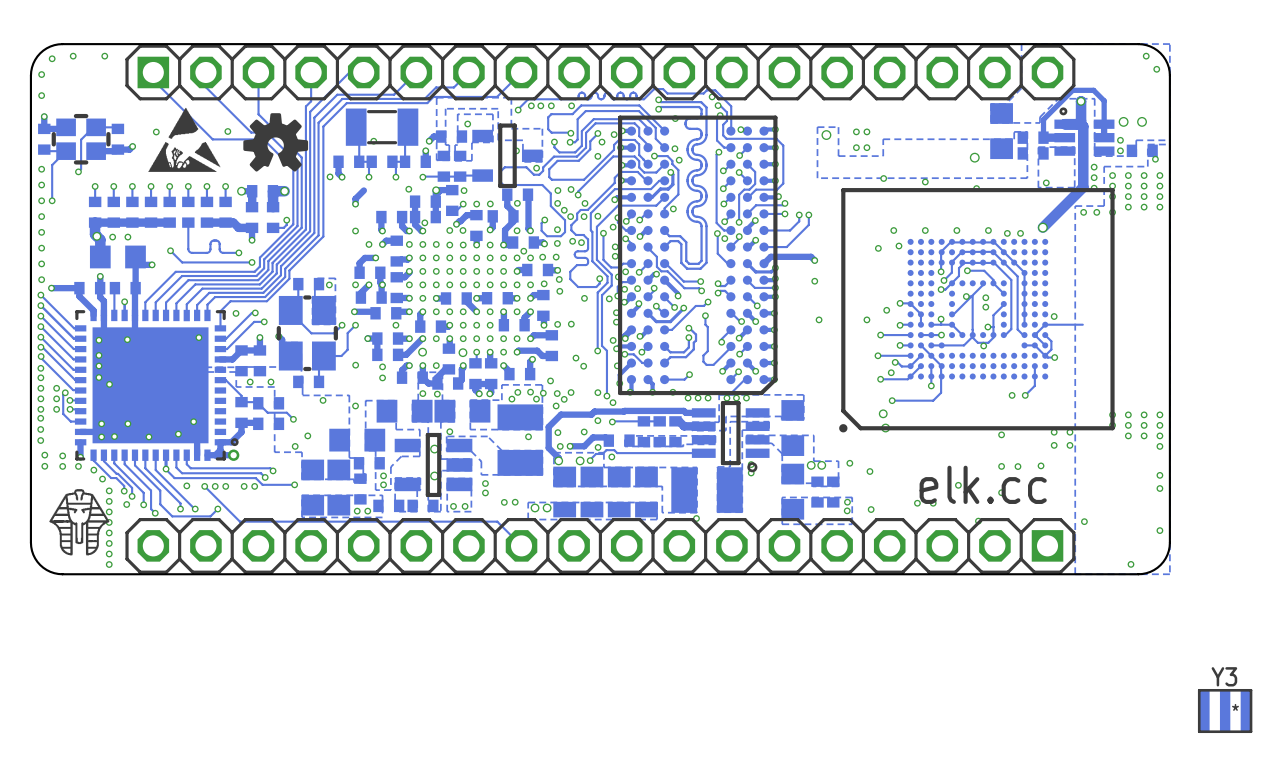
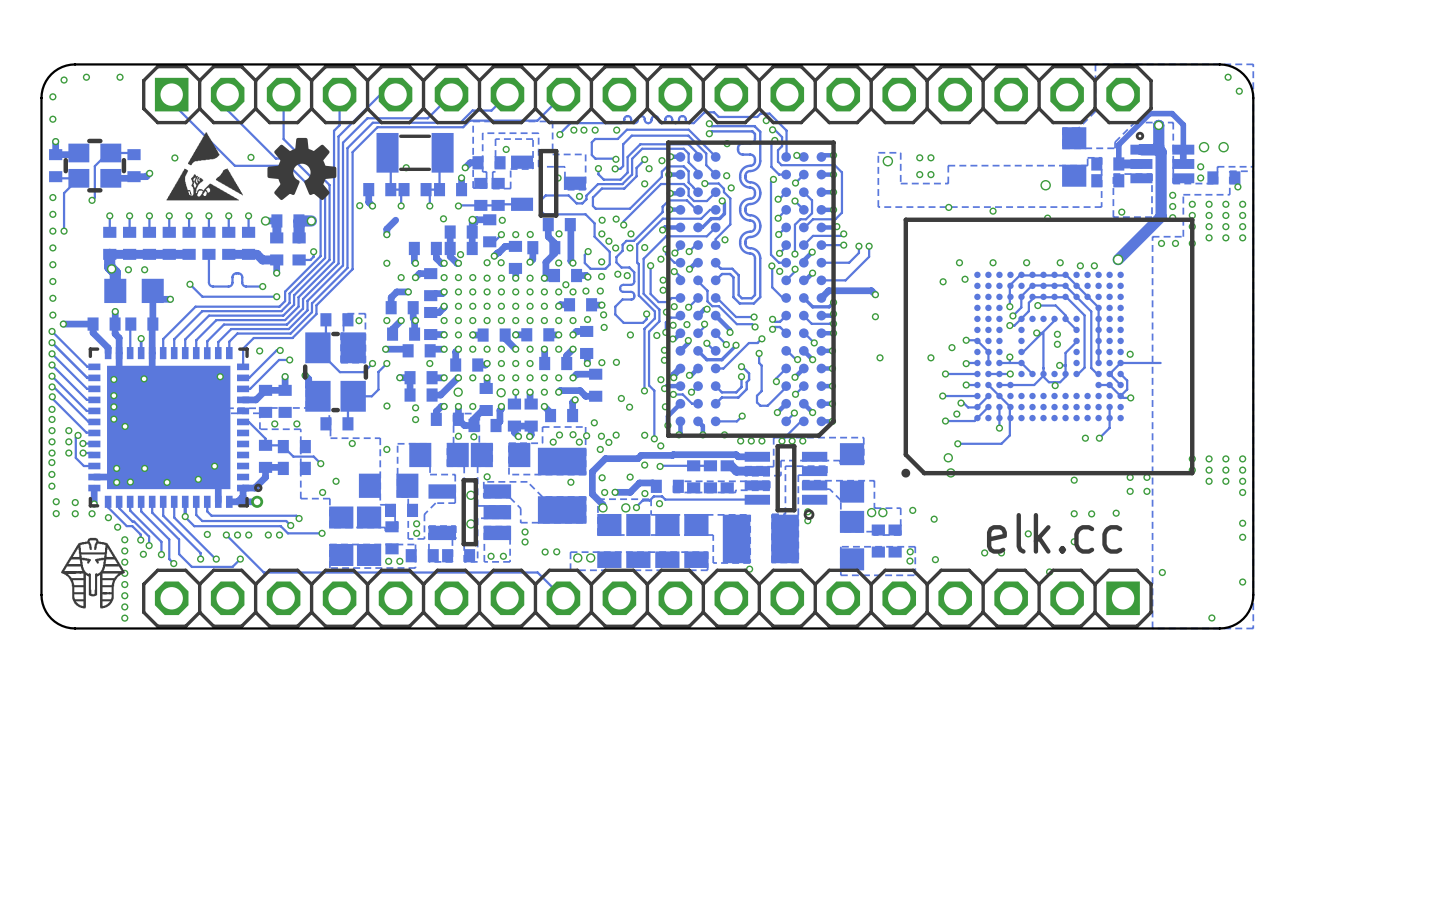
Y3: (1225, 711) -> none

